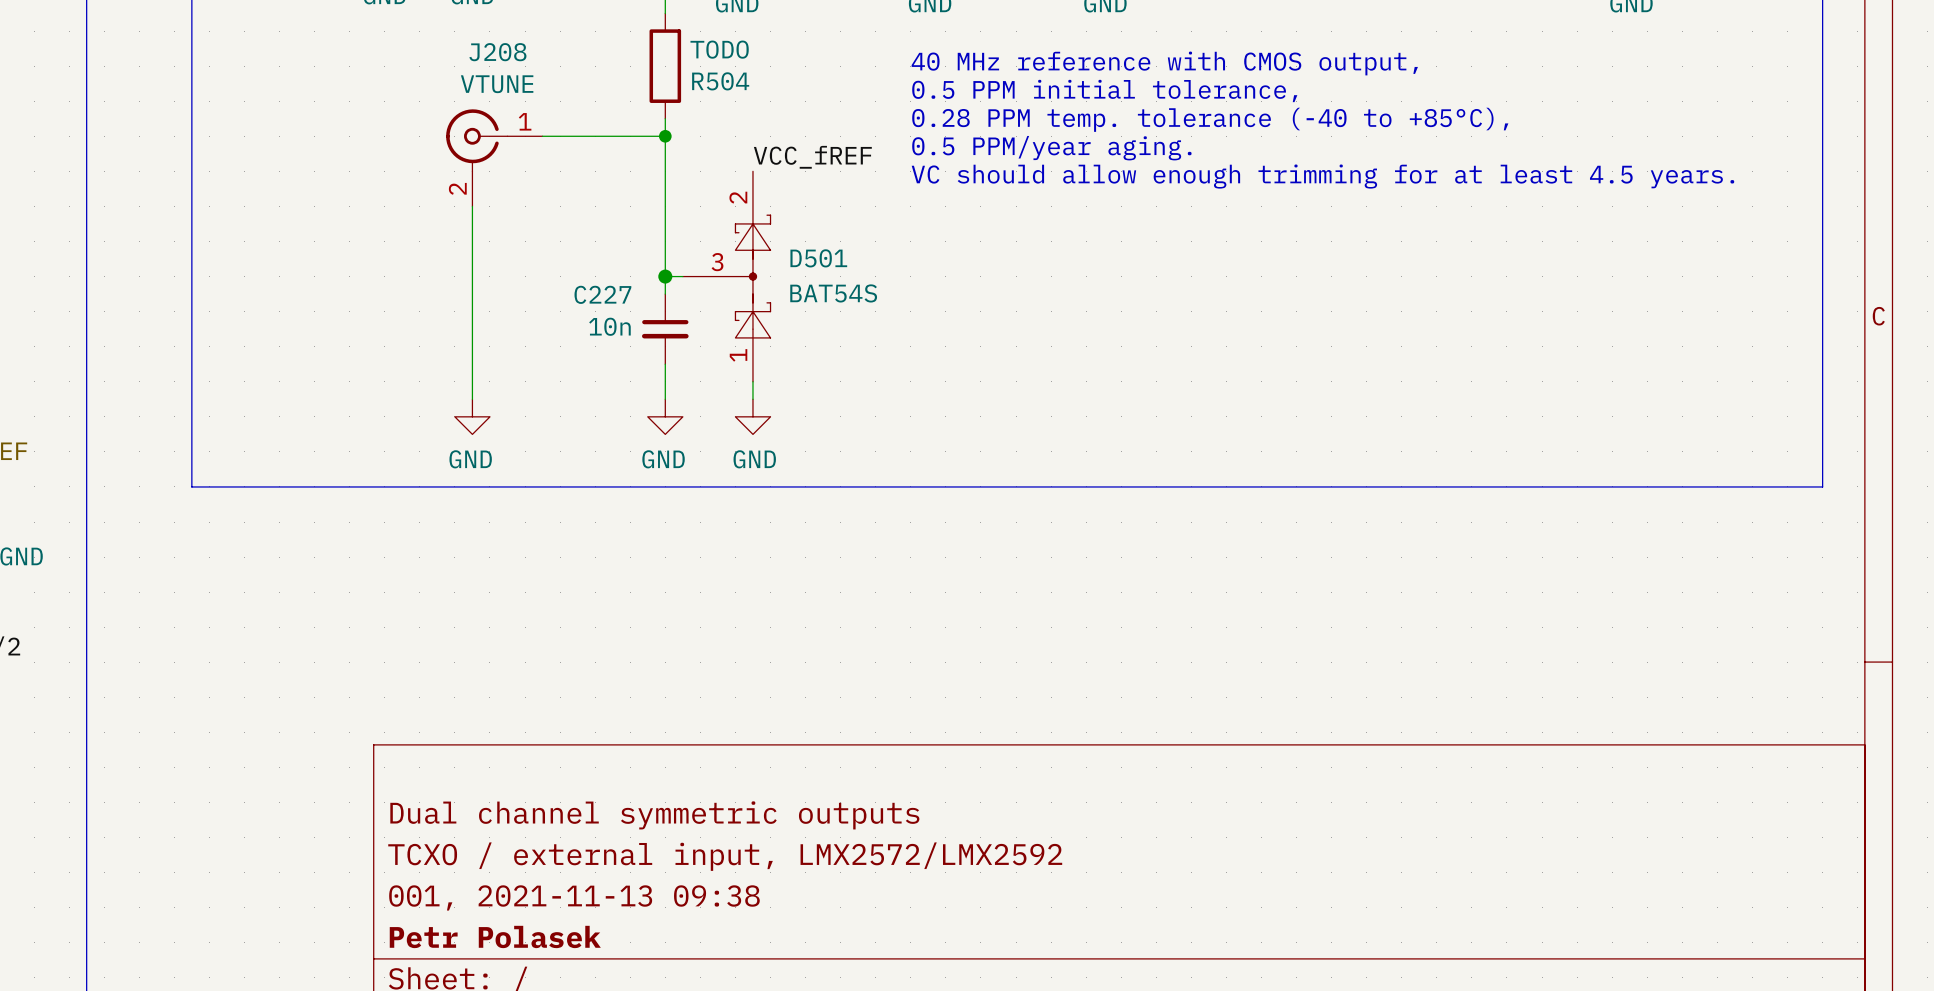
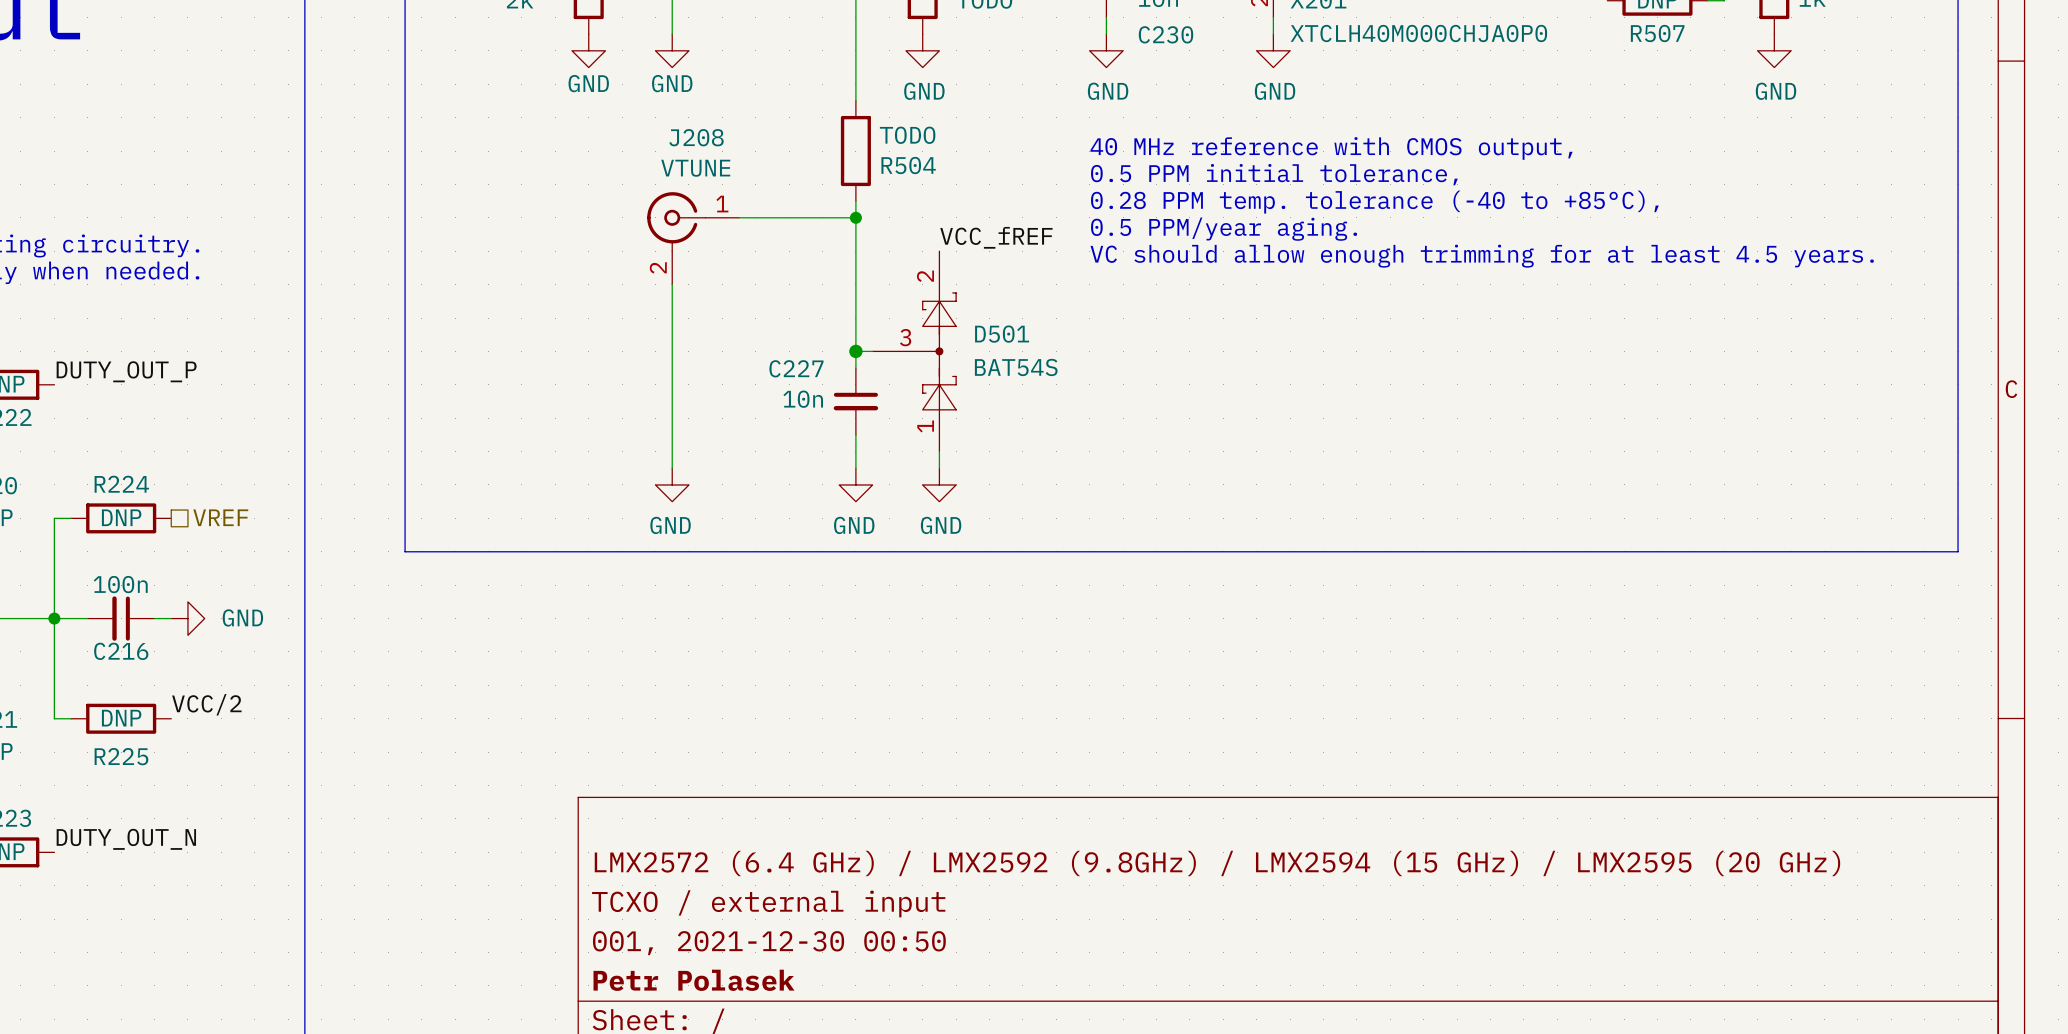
title block: Dual channel symmetric outputs (654, 815) -> LMX2572 (6.4 GHz) / LMX2592 (9.8GHz) / LMX2594 (15 GHz) / LMX2595 (20 GHz) (1217, 863)
title block: TCXO / external input, LMX2572/LMX2592 (725, 856) -> TCXO / external input (768, 903)
title block: 001, 2021-11-13 09:38 (574, 897) -> 001, 2021-12-30 00:50 (769, 943)

